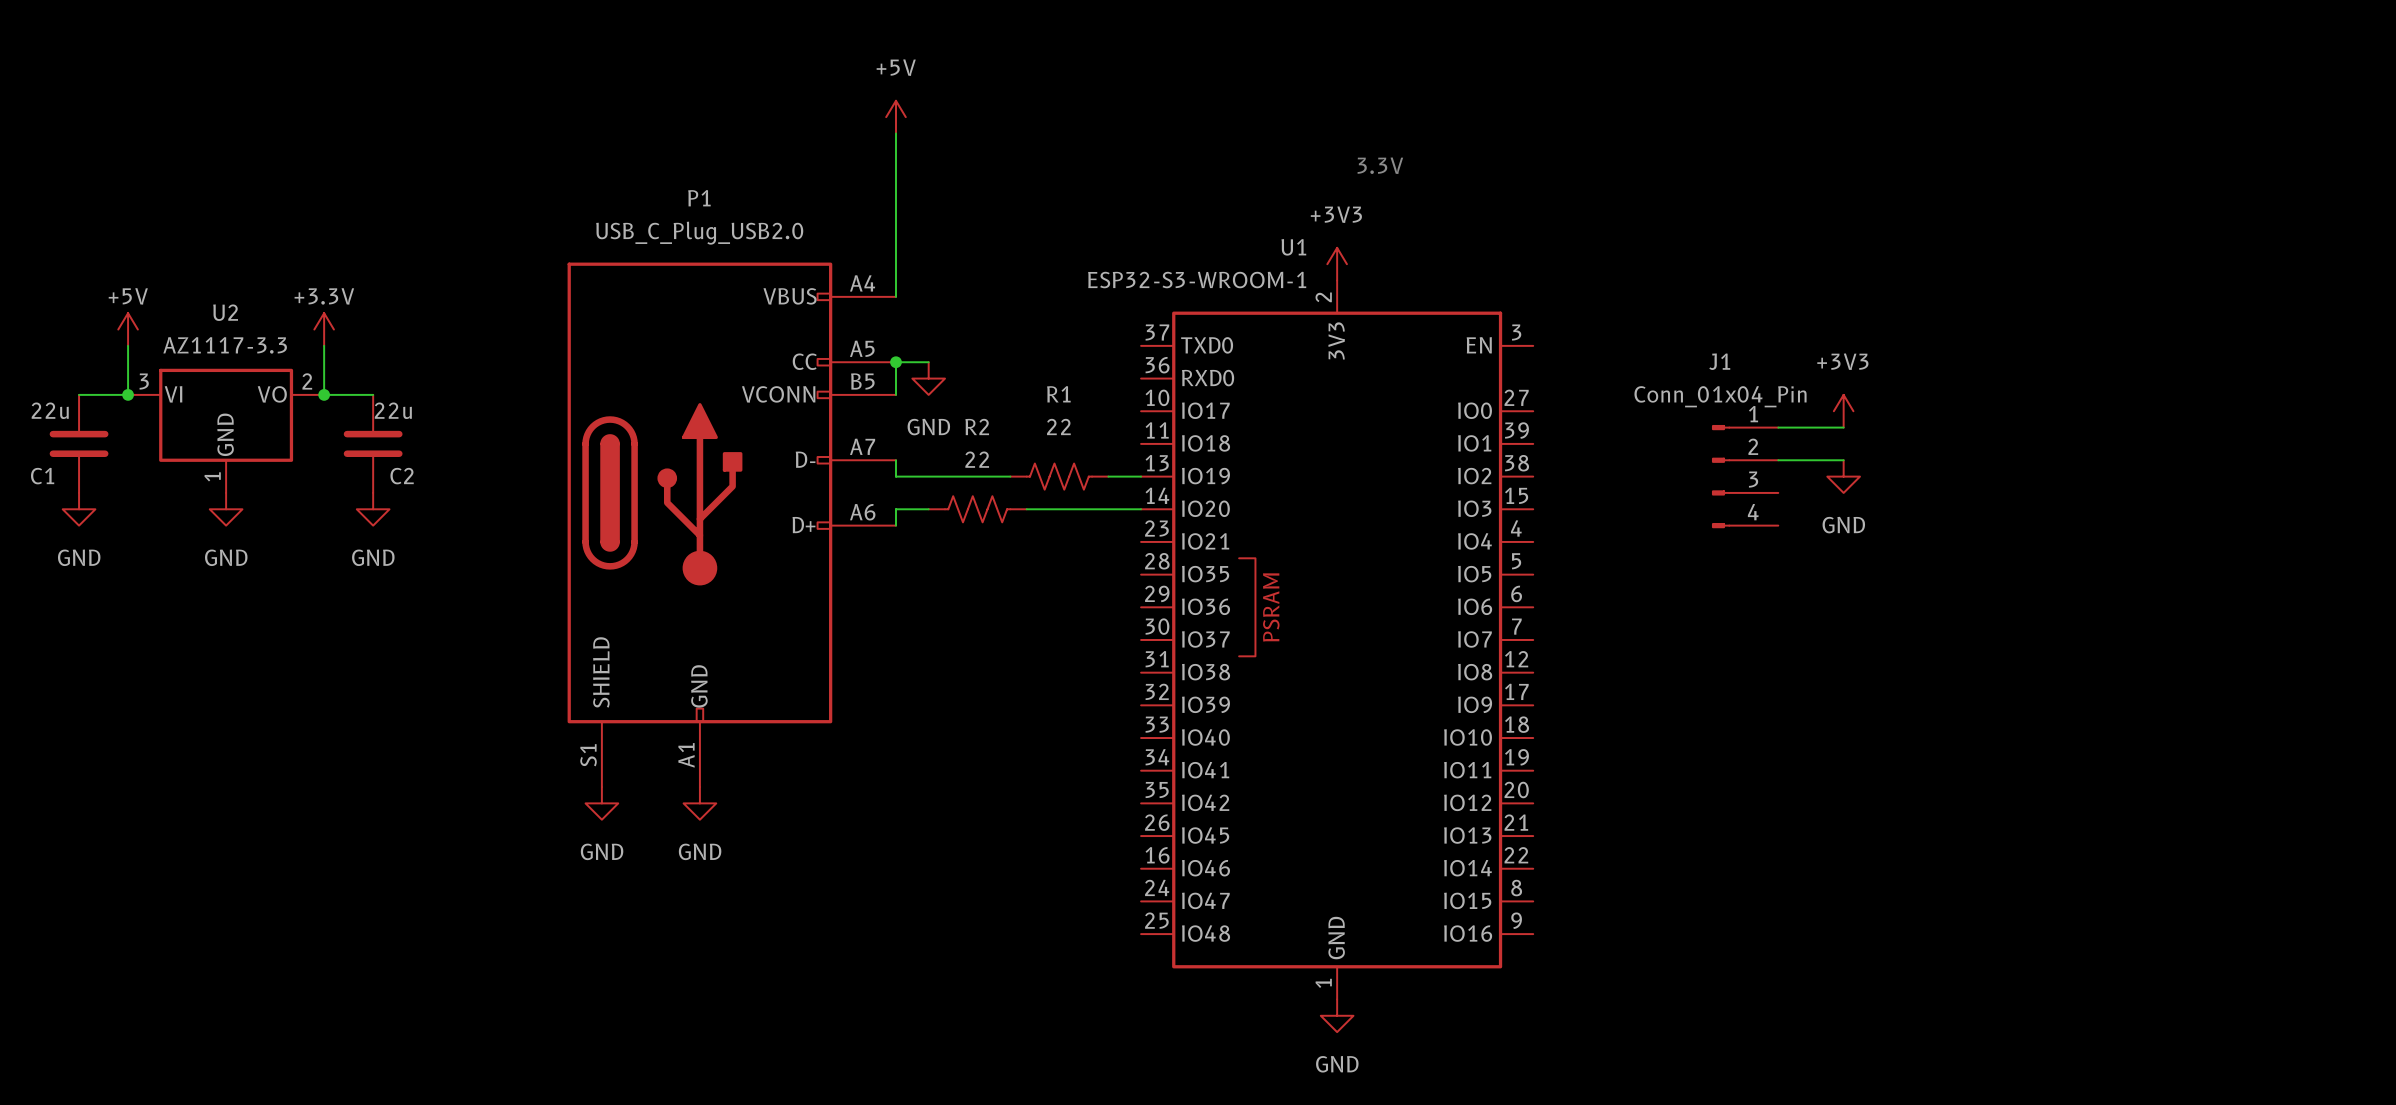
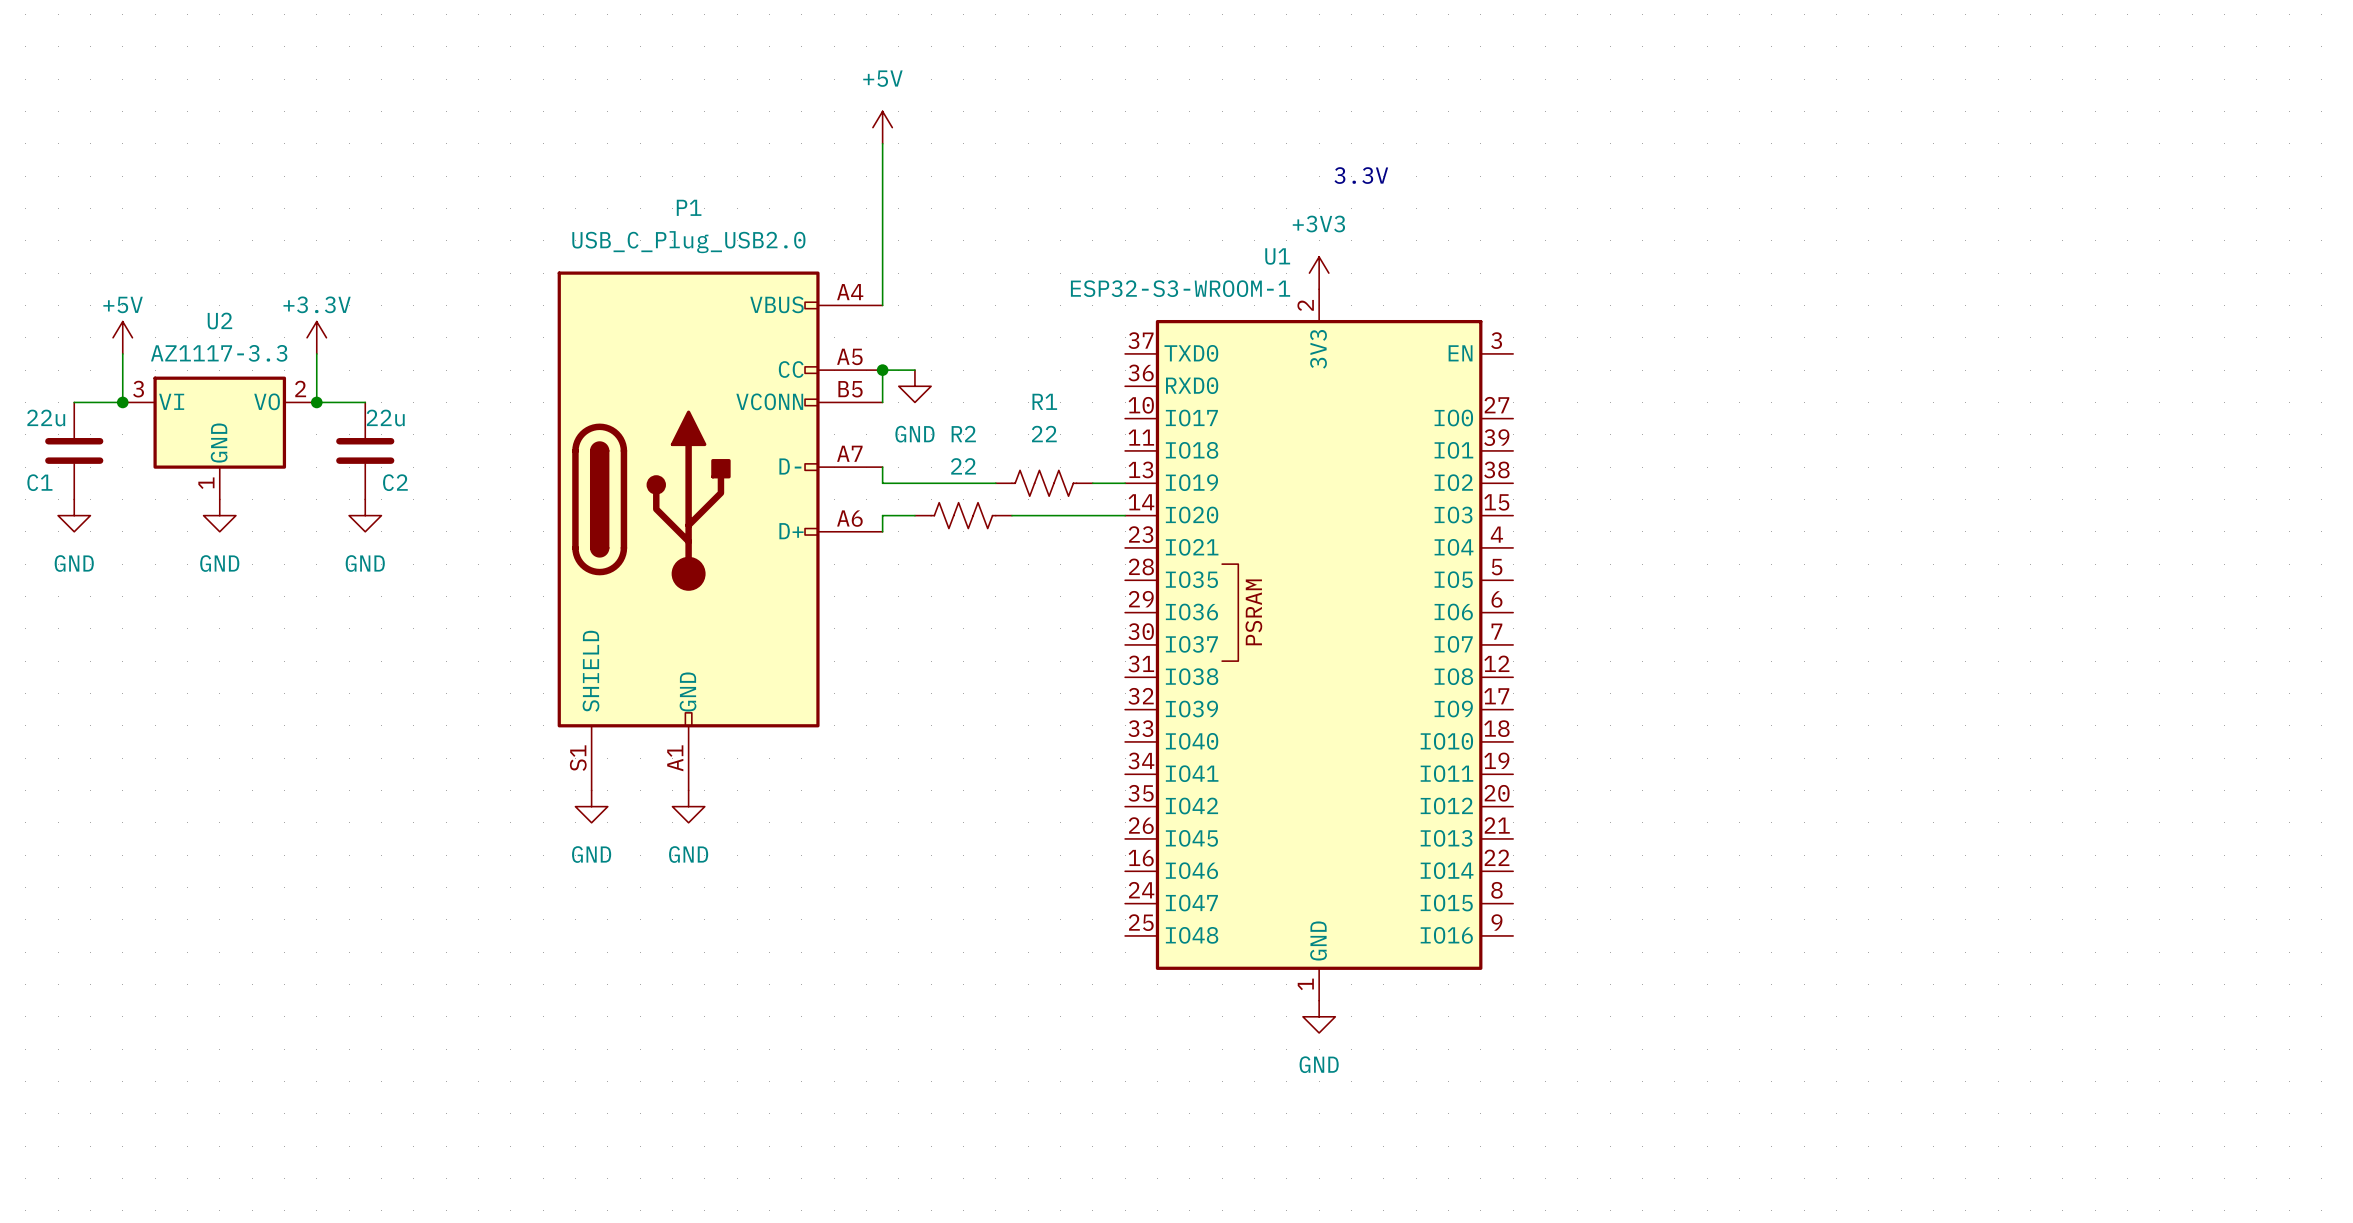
power symbol: +3V3 (1843, 411) -> none
wire: (1778, 427) (1843, 427) -> none
wire: (1778, 460) (1843, 460) -> none
J1: Conn_01x04_Pin (1745, 476) -> none
power symbol: GND (1843, 476) -> none

